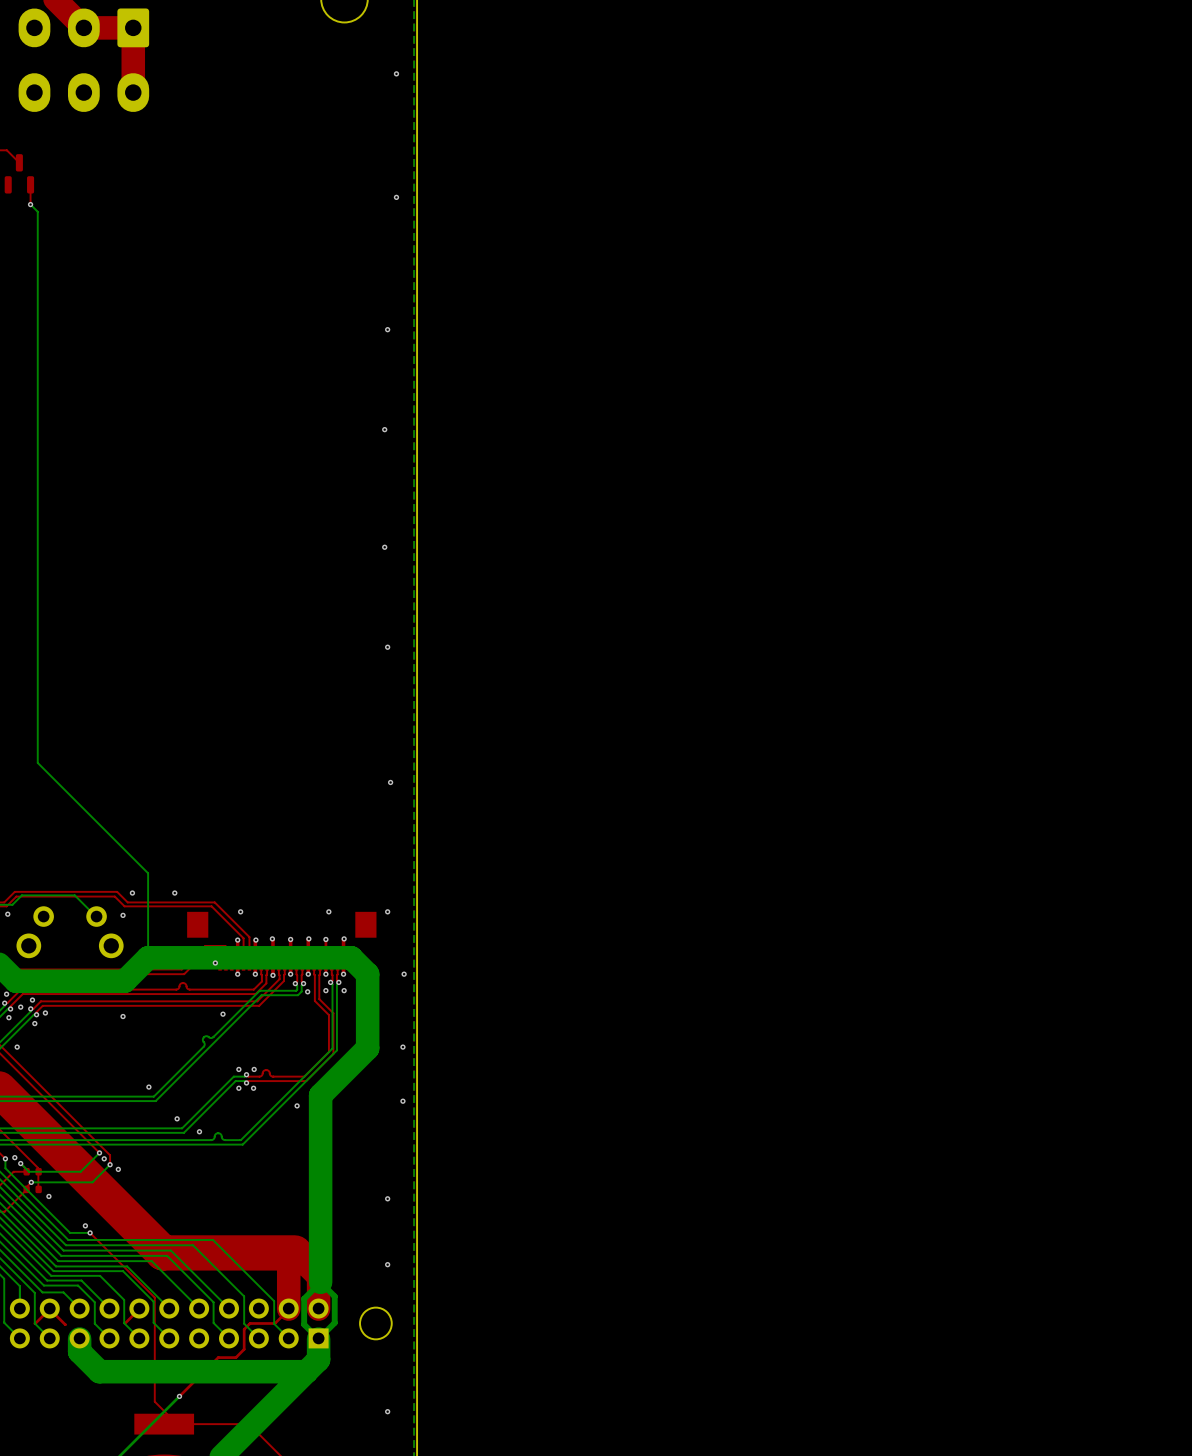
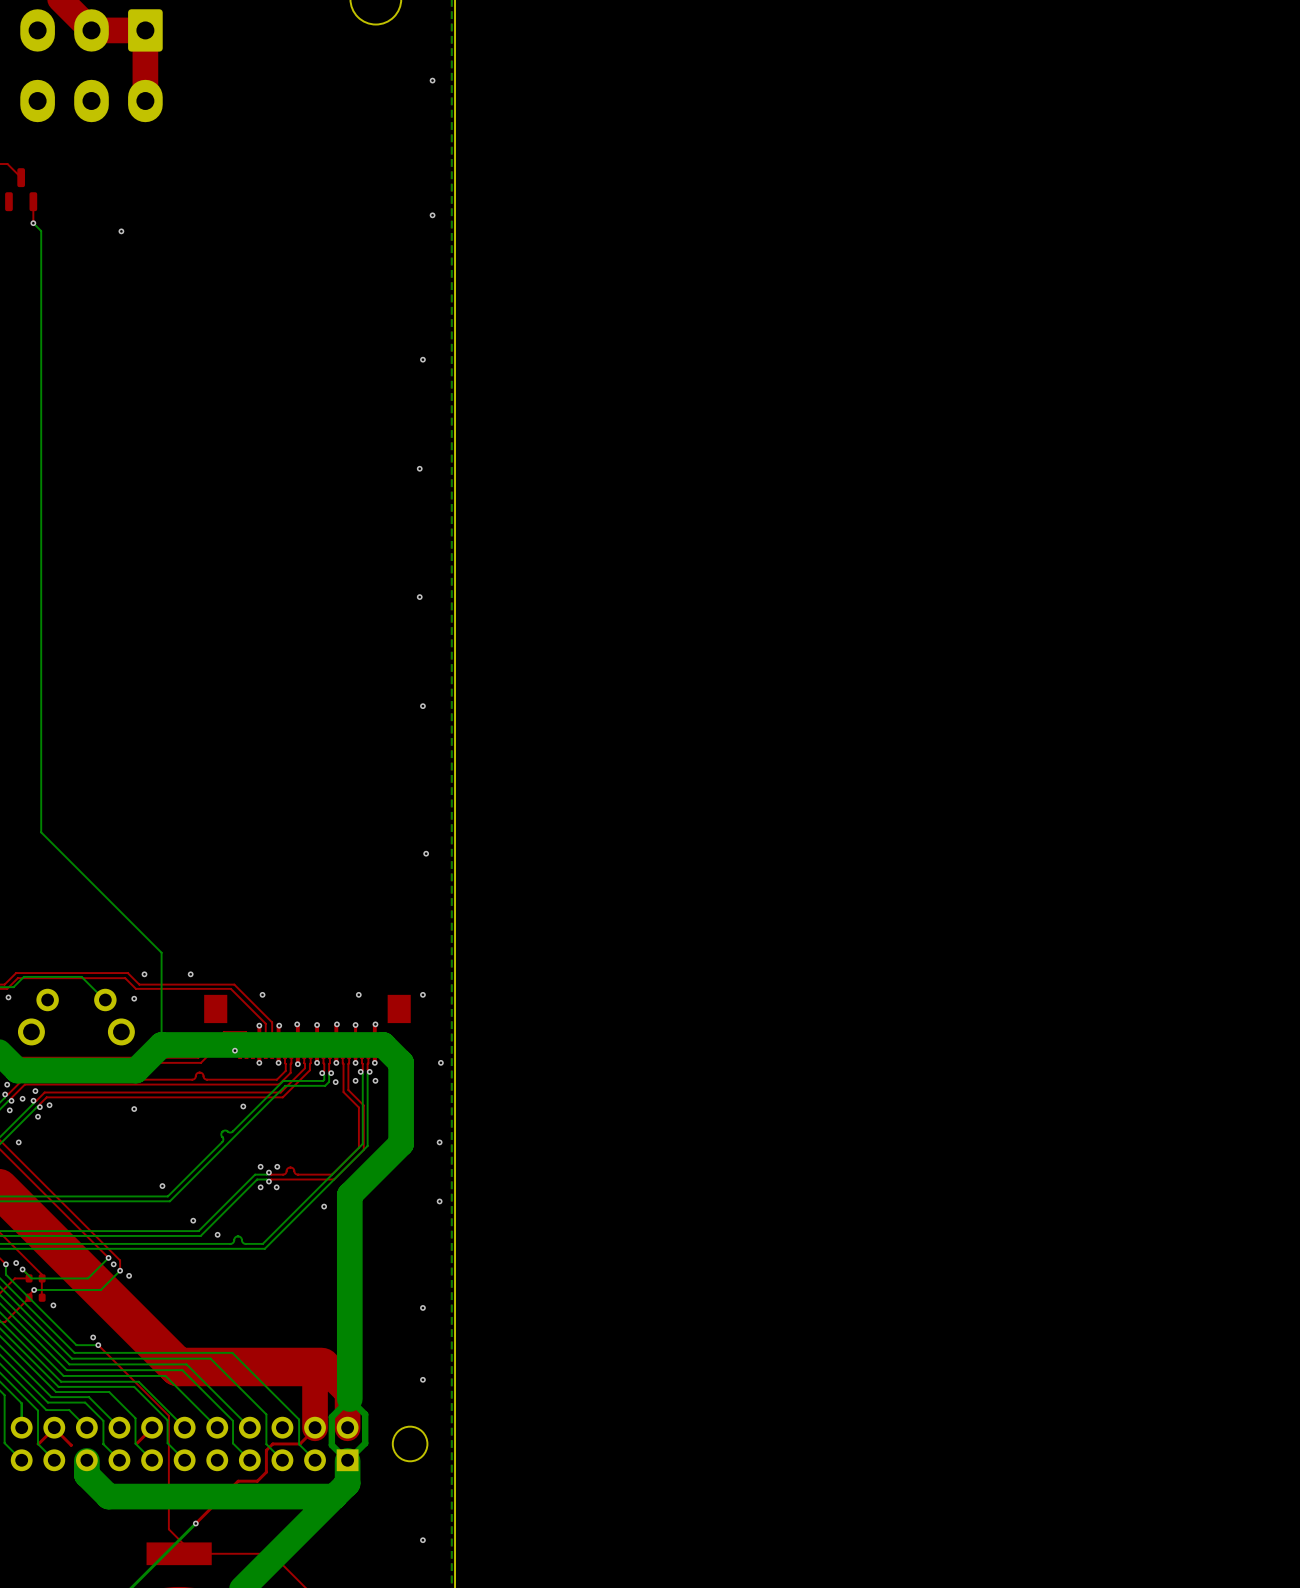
via: none -> (121, 231)

